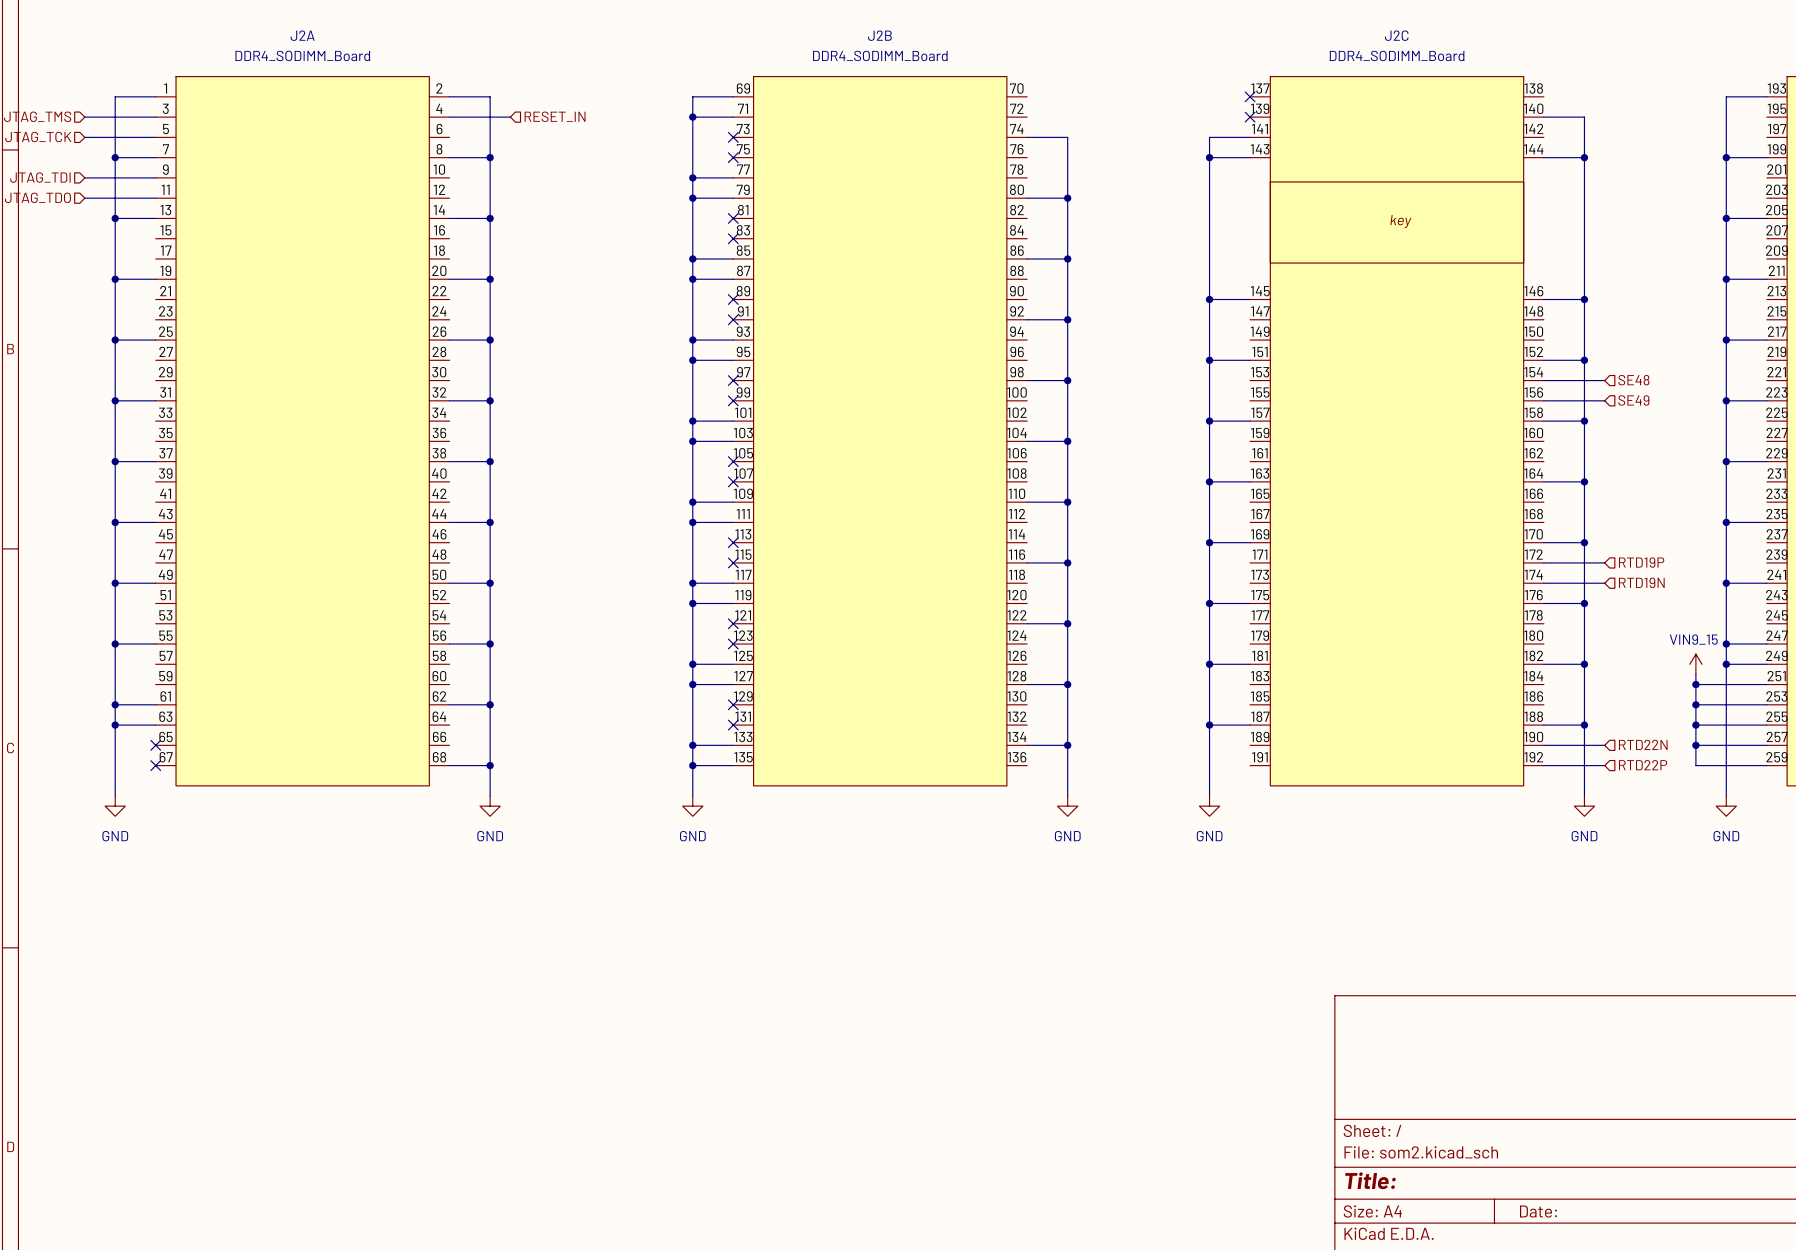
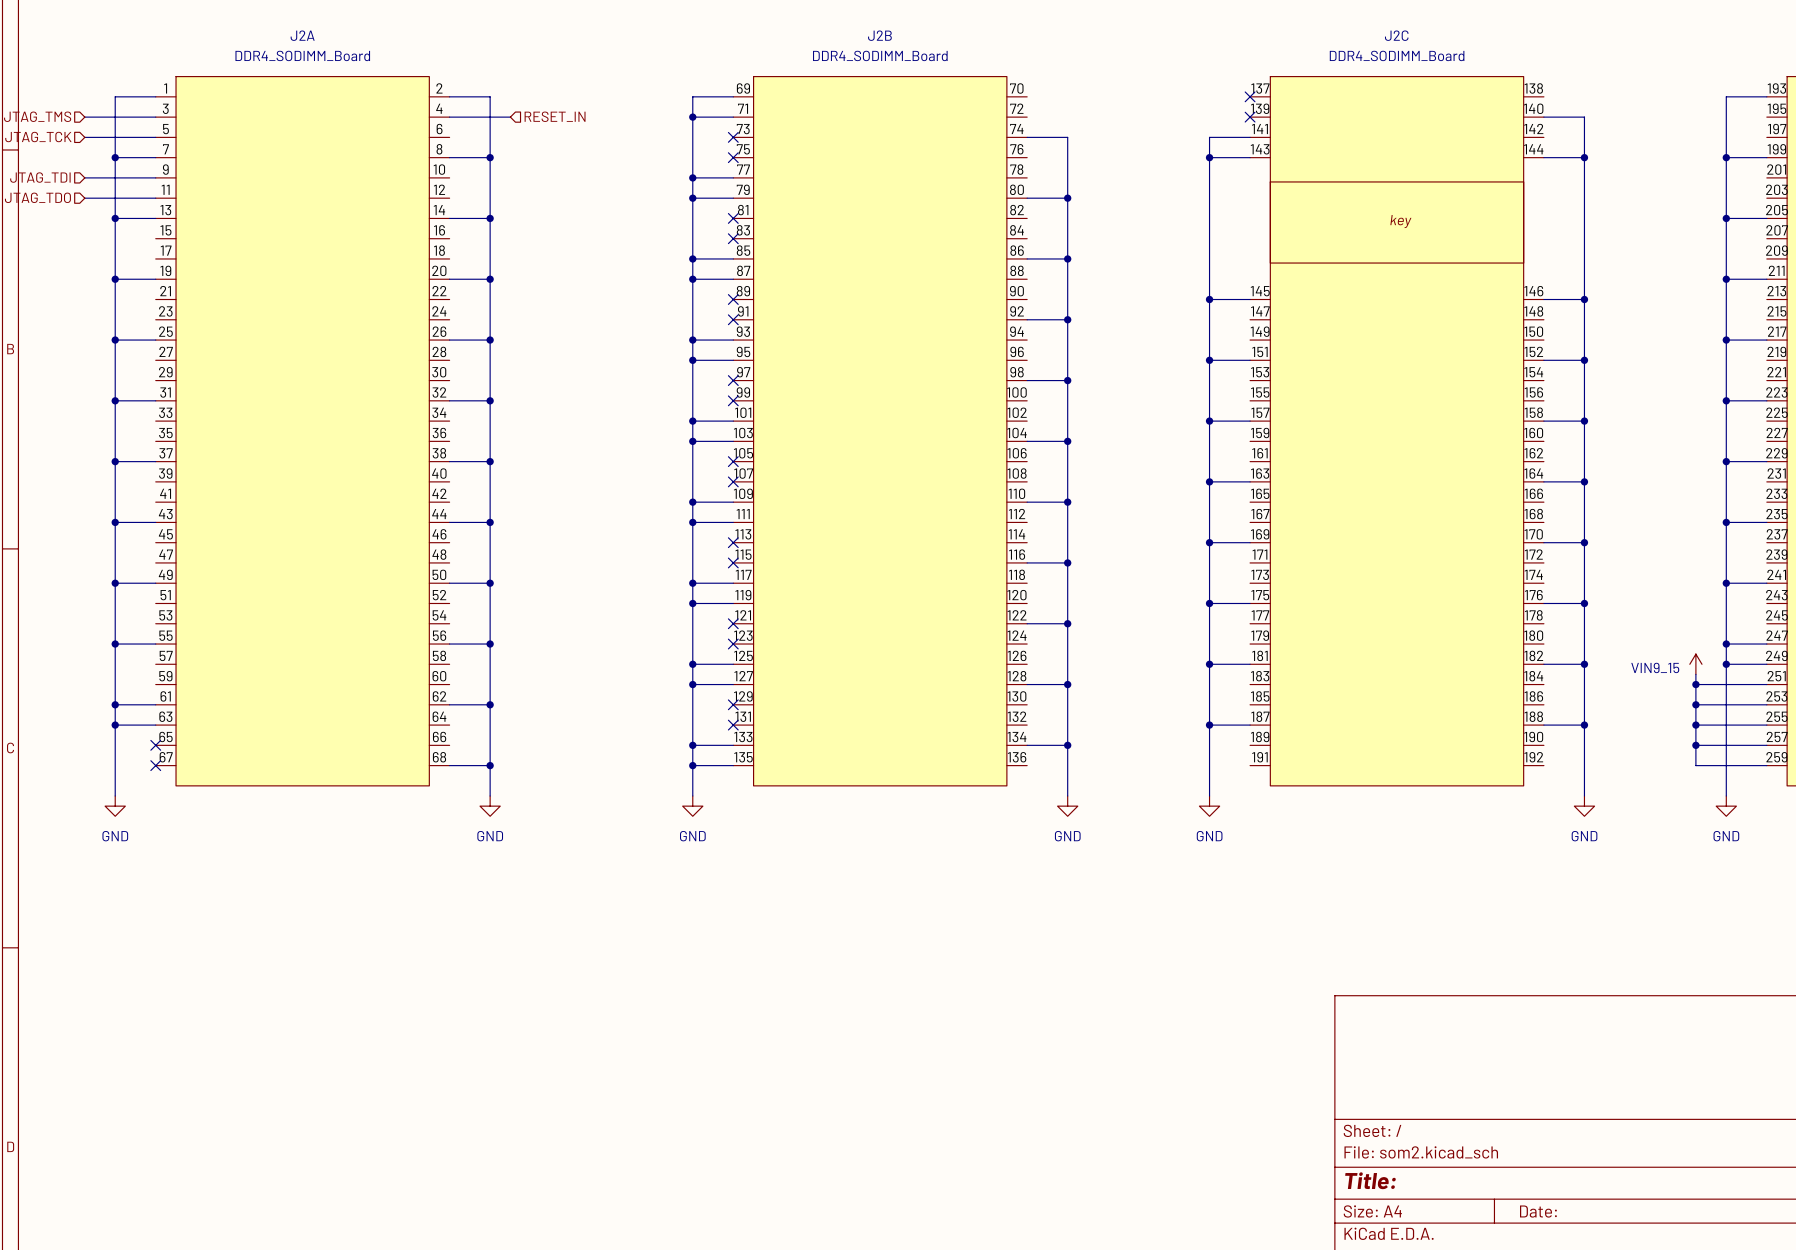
wire: (1543, 380) (1604, 380) -> none
hierarchical label: SE48 (1633, 380) -> none
wire: (1543, 400) (1604, 400) -> none
hierarchical label: SE49 (1633, 400) -> none
wire: (1543, 562) (1604, 562) -> none
hierarchical label: RTD19P (1641, 562) -> none
hierarchical label: RTD19N (1641, 582) -> none
wire: (1543, 583) (1604, 583) -> none
power symbol text position: VIN9_15 (1693, 639) -> VIN9_15 (1655, 667)
hierarchical label: RTD22N (1643, 744) -> none
wire: (1543, 745) (1604, 745) -> none
wire: (1543, 765) (1604, 765) -> none
hierarchical label: RTD22P (1643, 765) -> none

